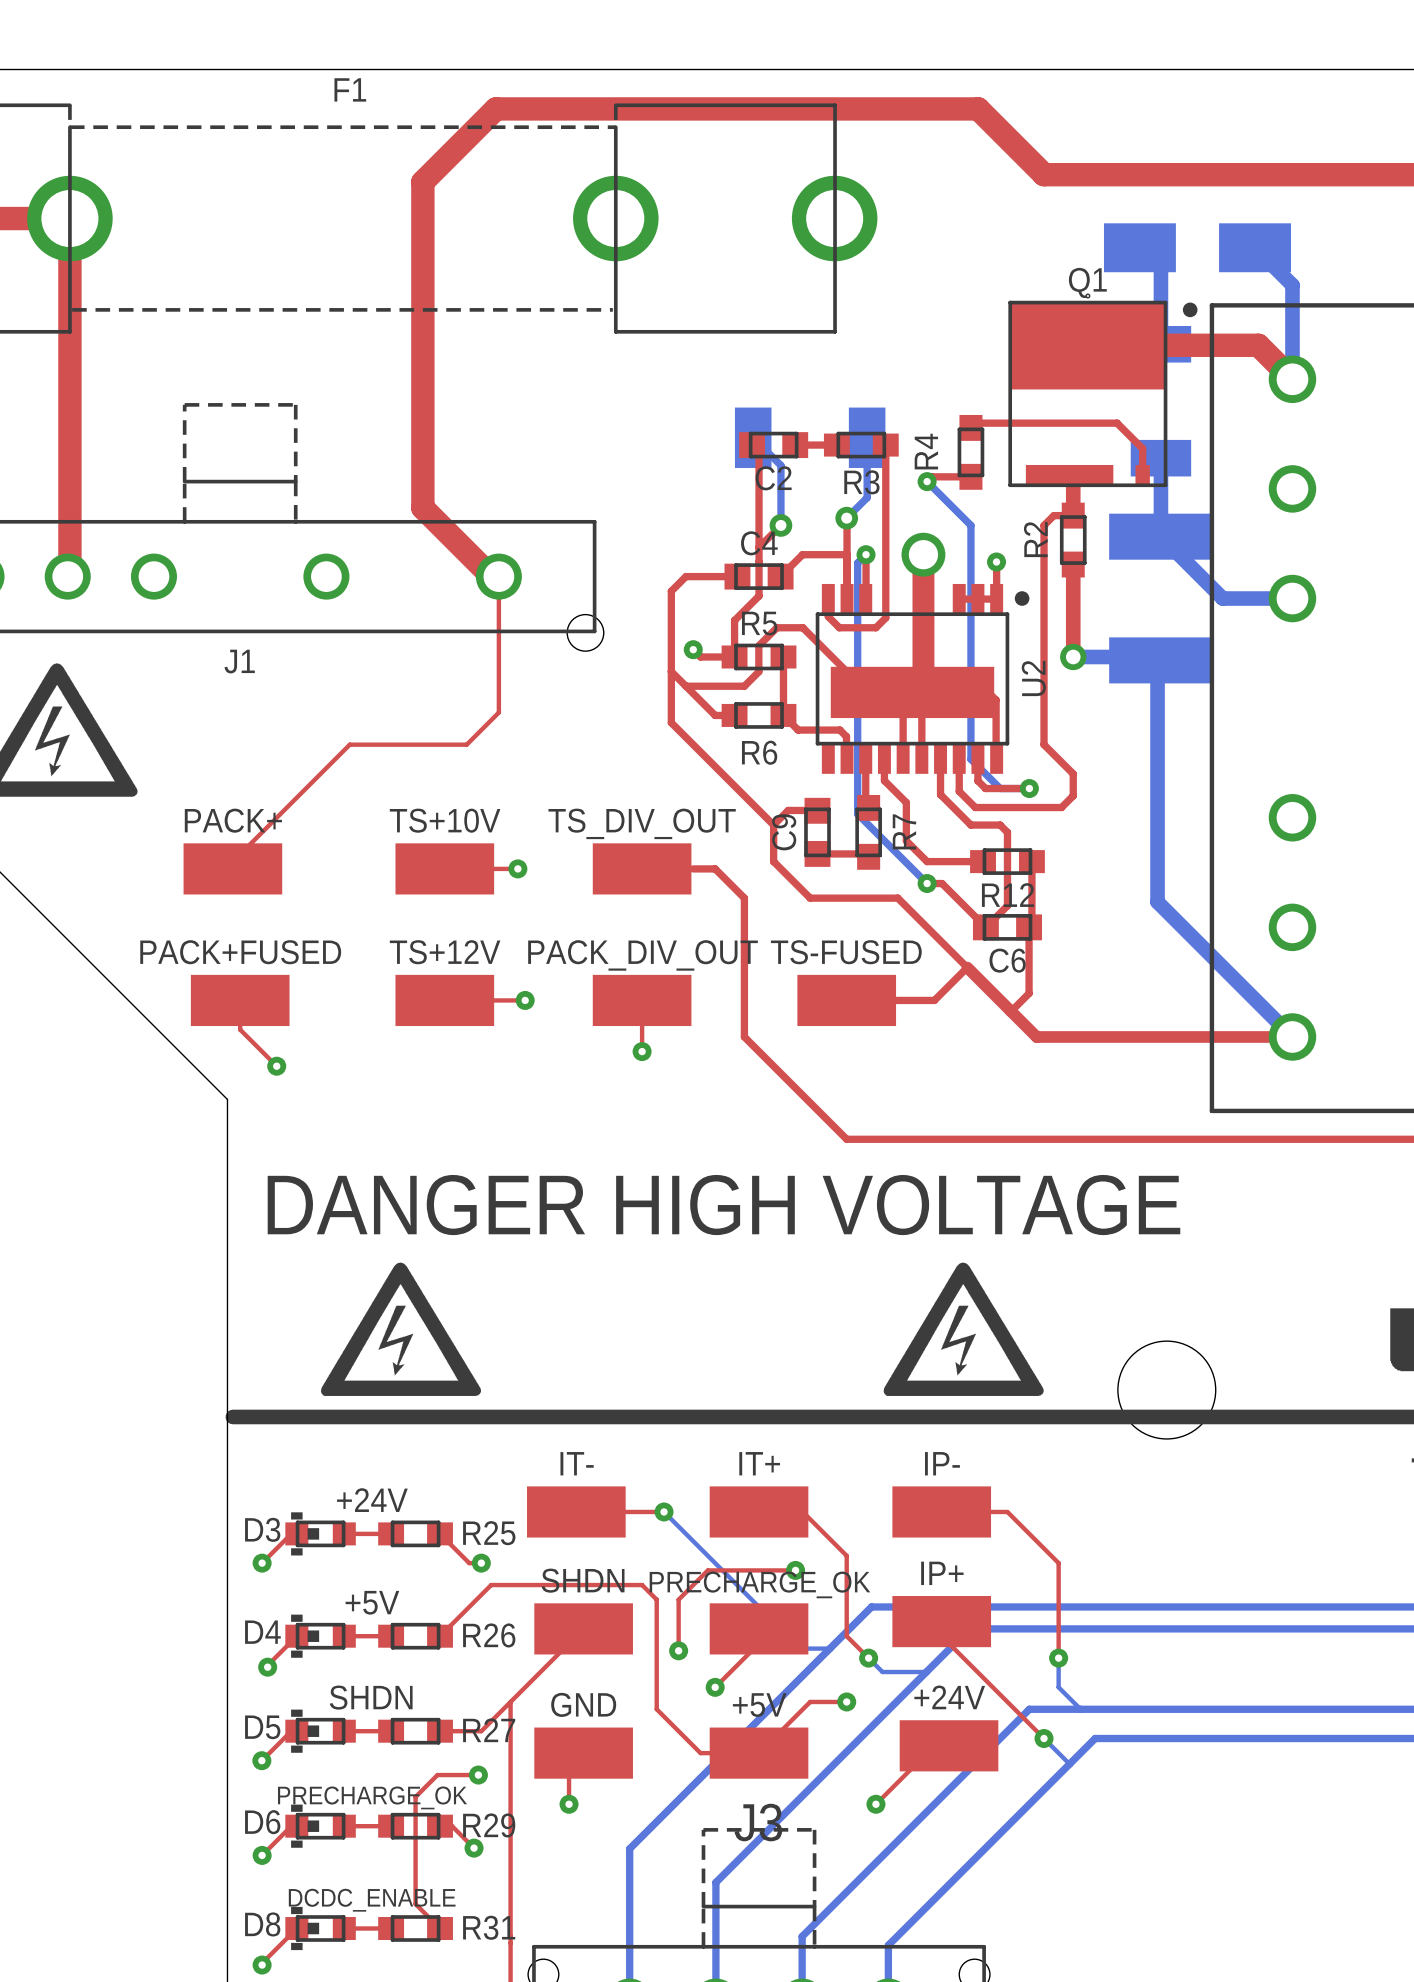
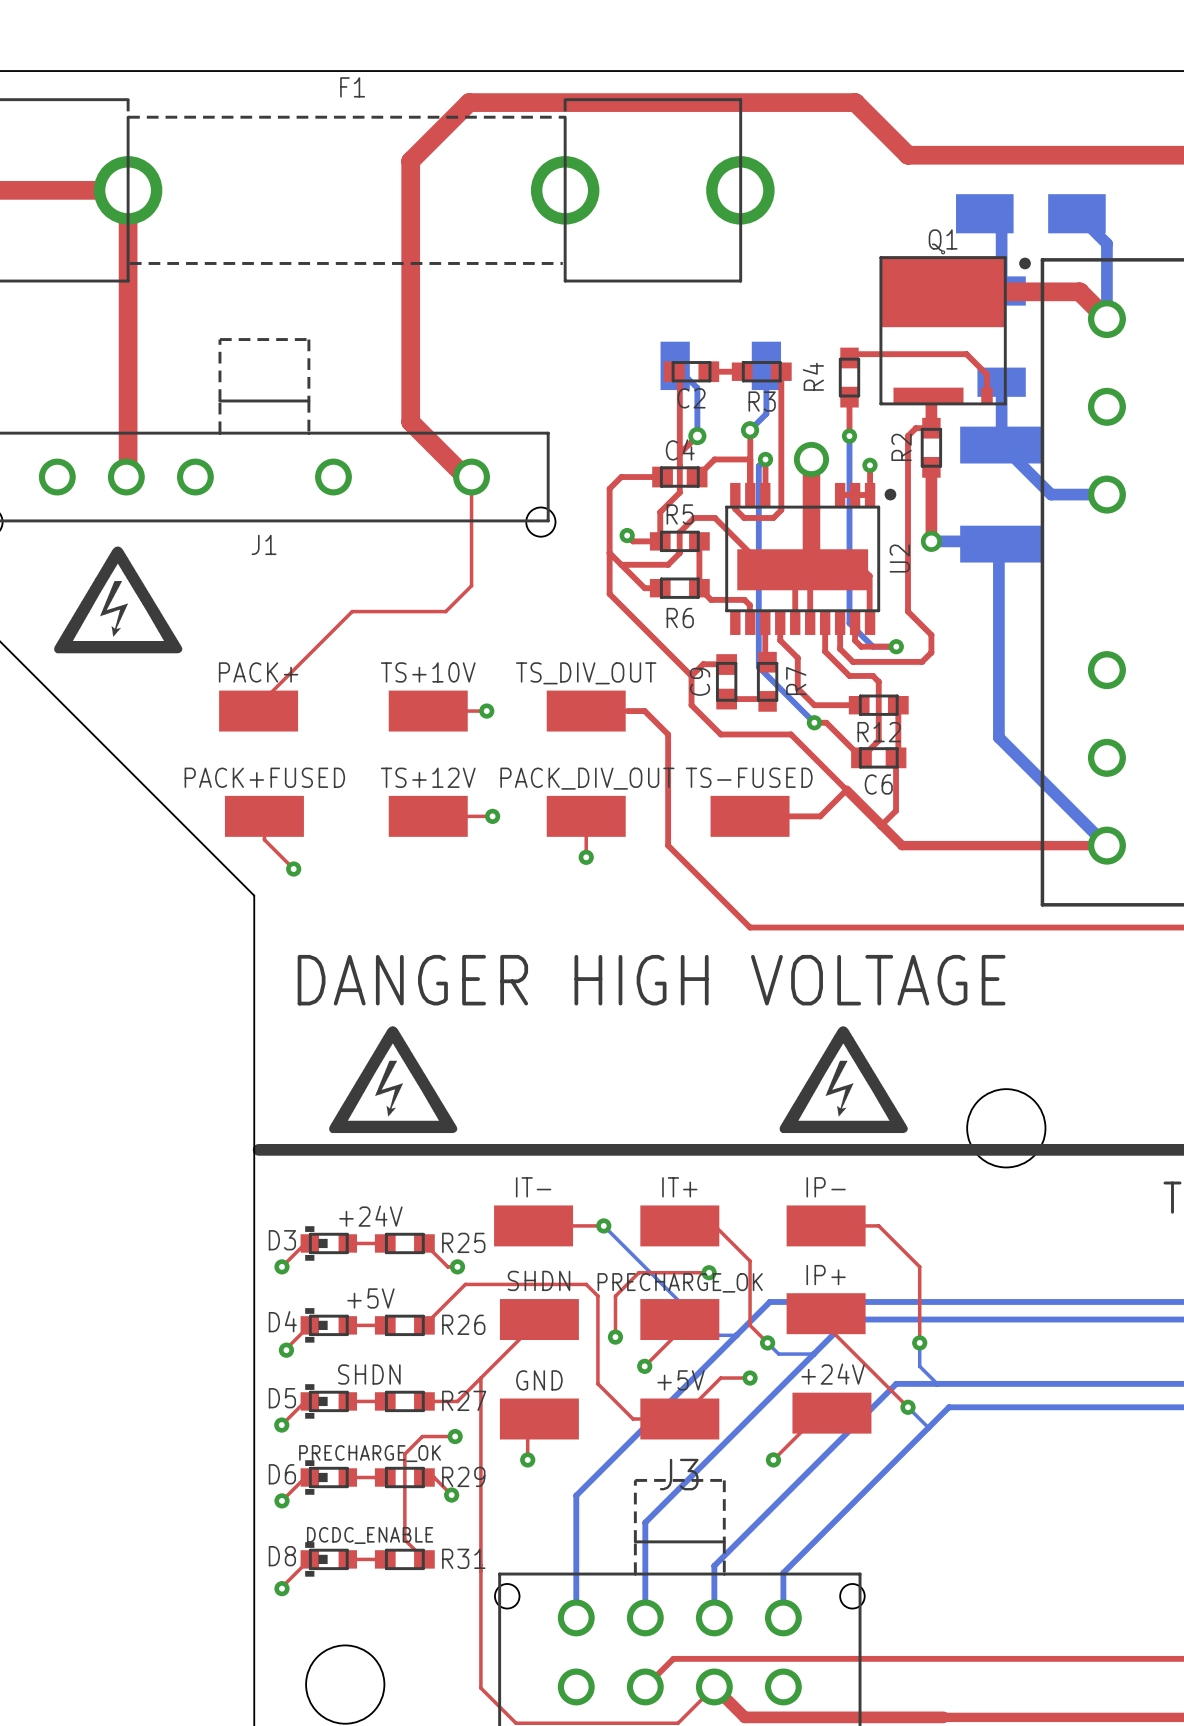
top track: (970, 476) (931, 476) (927, 481) -> (849, 397) (849, 436)
bottom track: (927, 481) (970, 525) -> none
via position: (927, 481) -> (849, 436)

